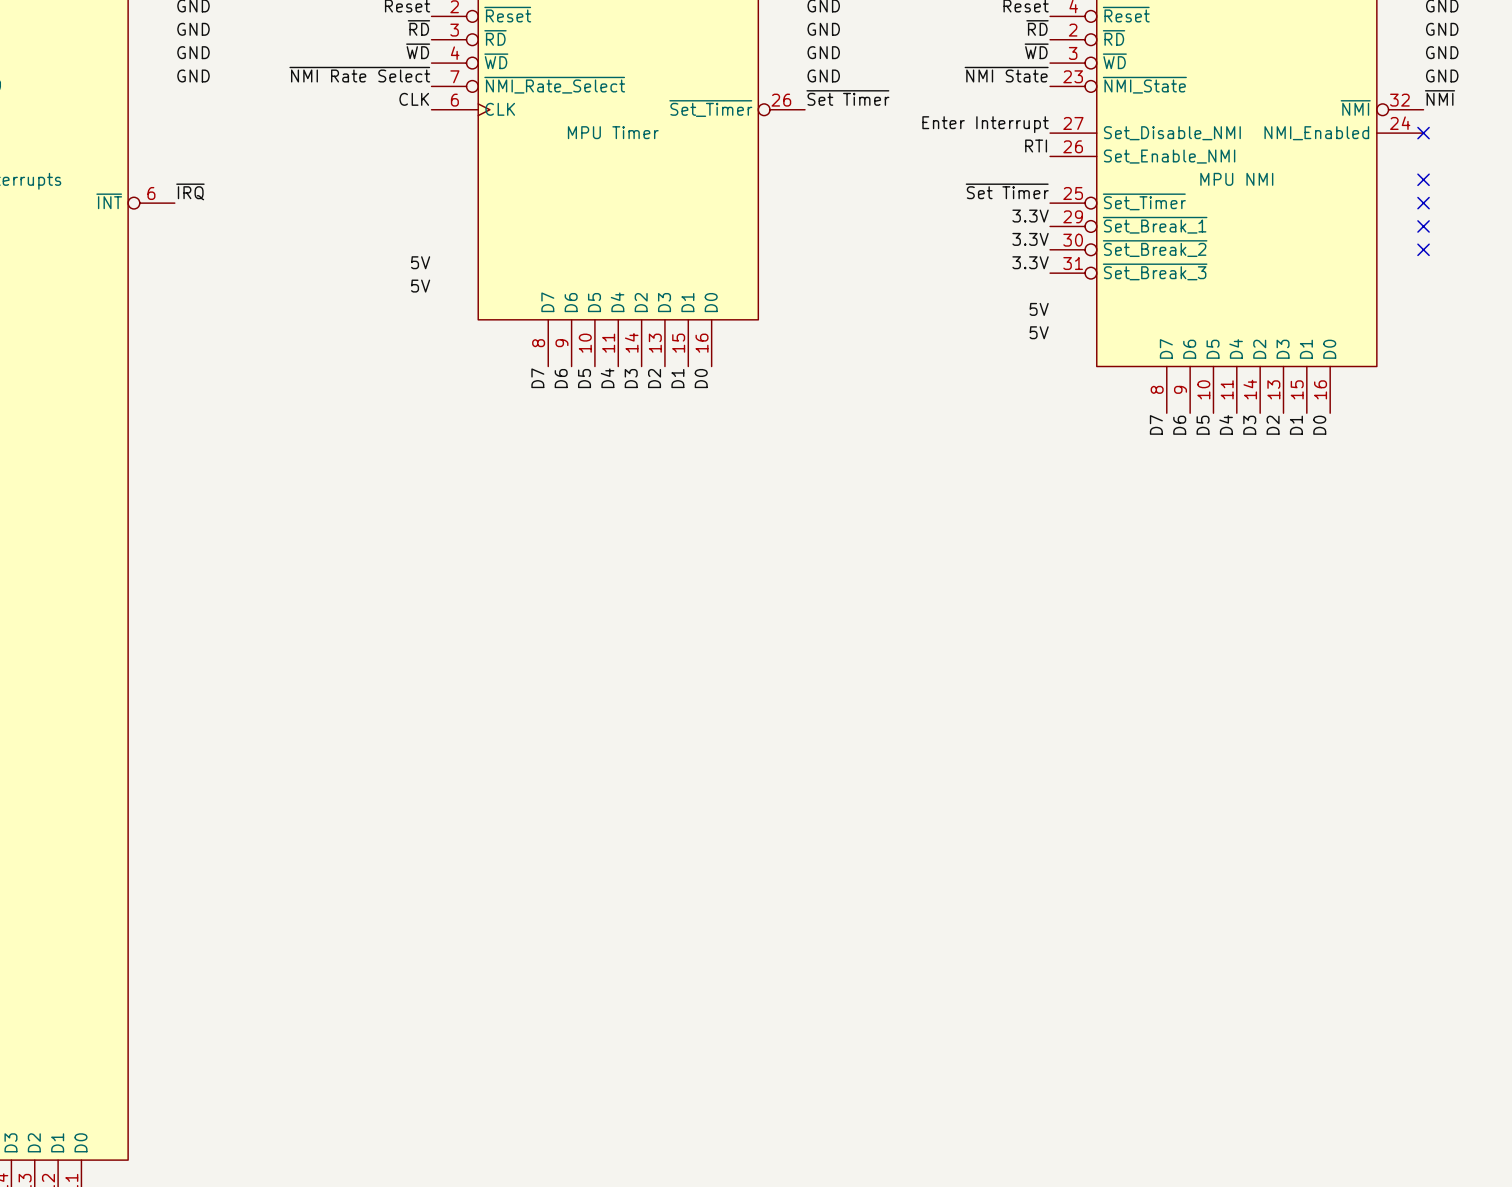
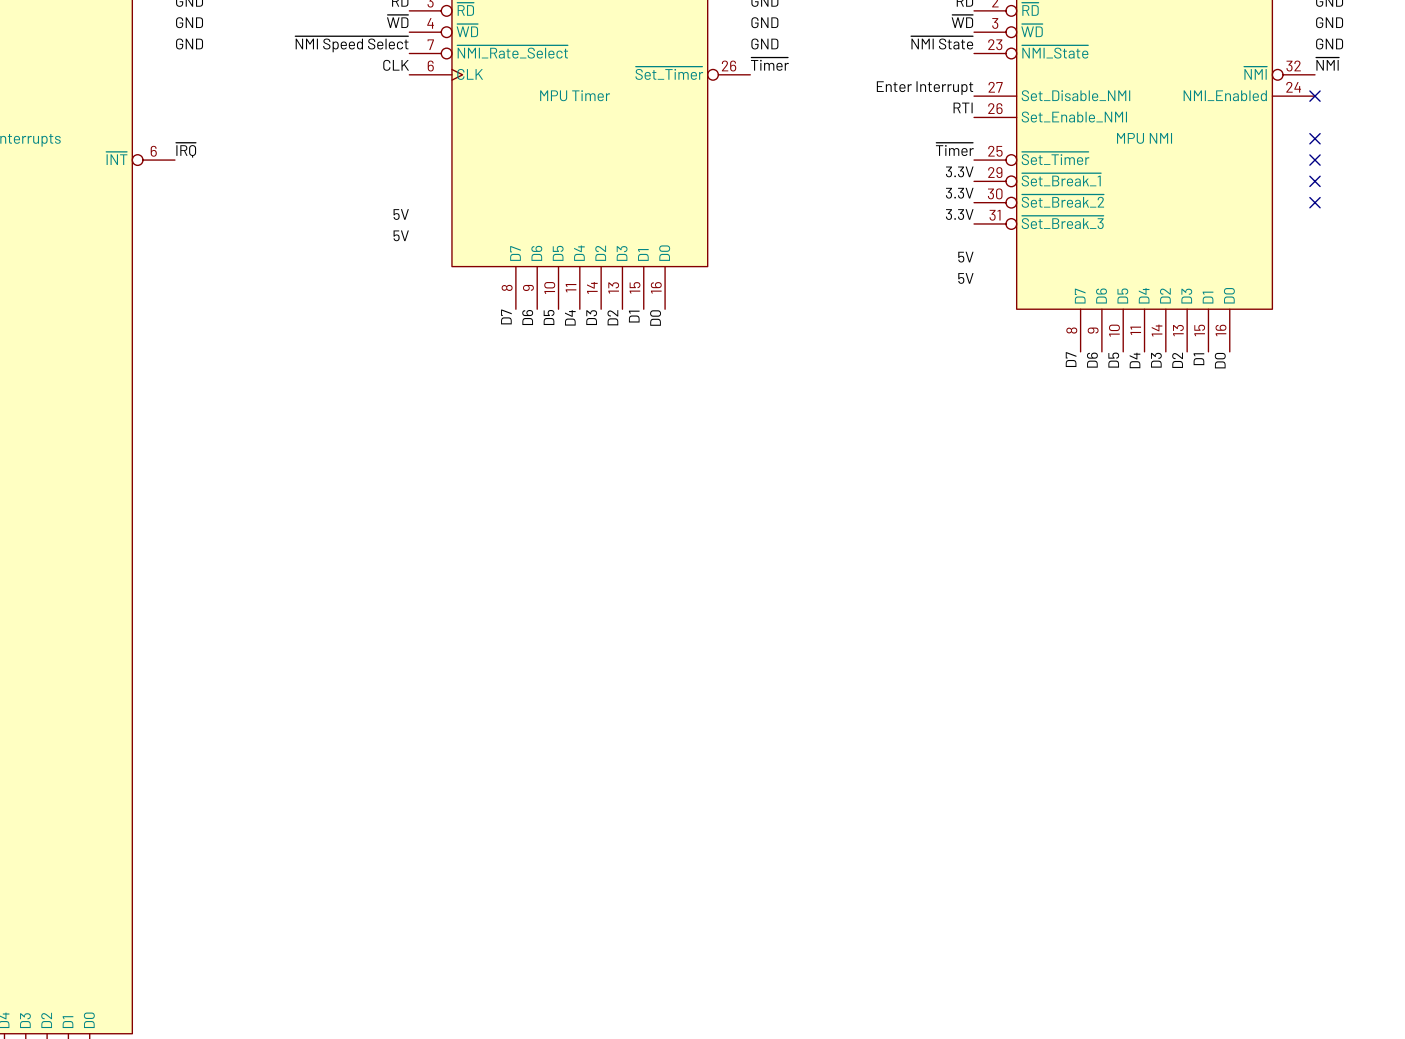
label: ~{NMI Rate Select} (359, 74) -> ~{NMI Speed Select} (351, 44)
label: ~{Set Timer} (847, 98) -> ~{Timer} (769, 64)
label: ~{Set Timer} (1007, 191) -> ~{Timer} (954, 149)

